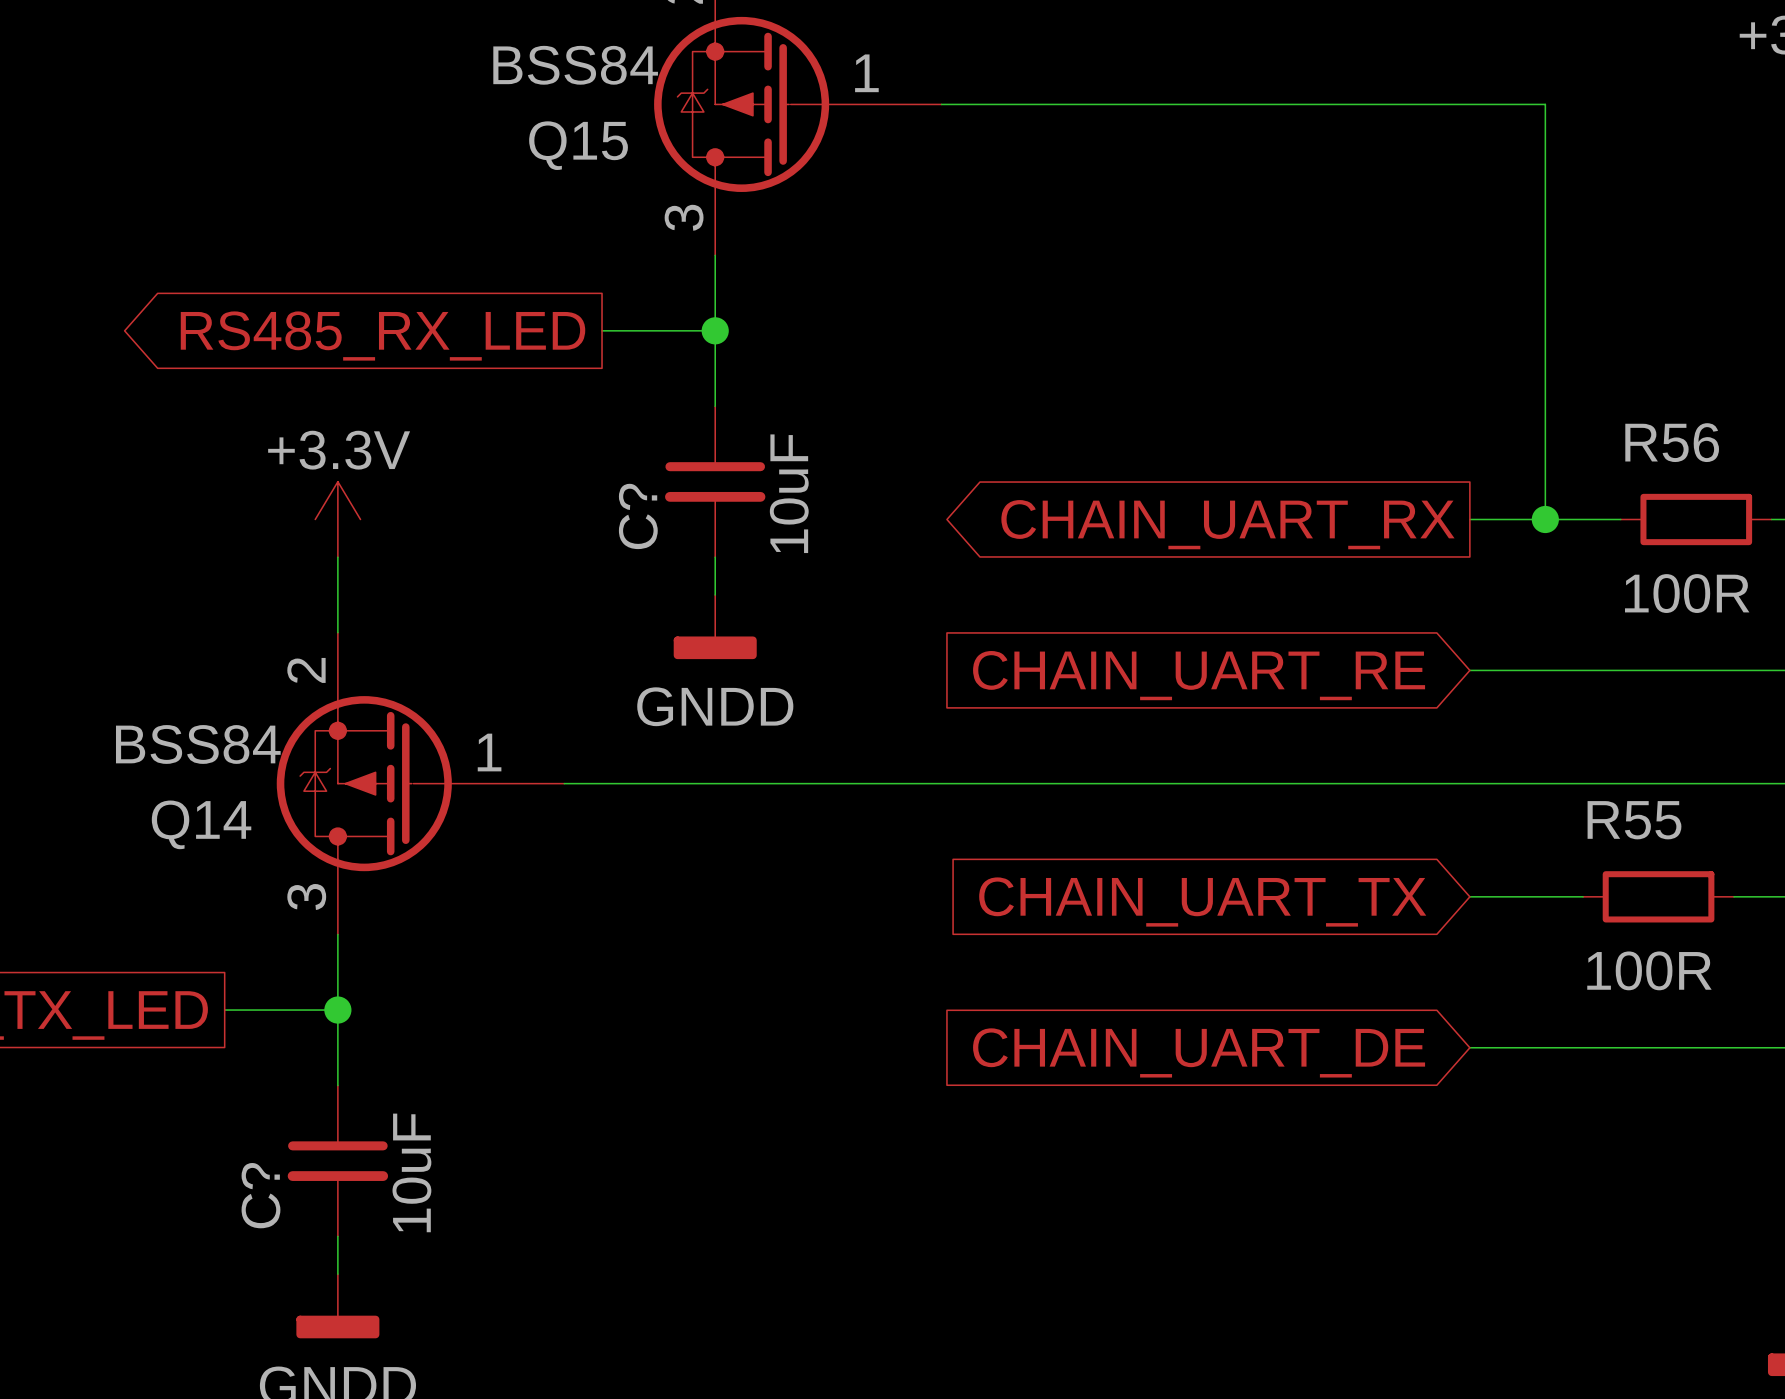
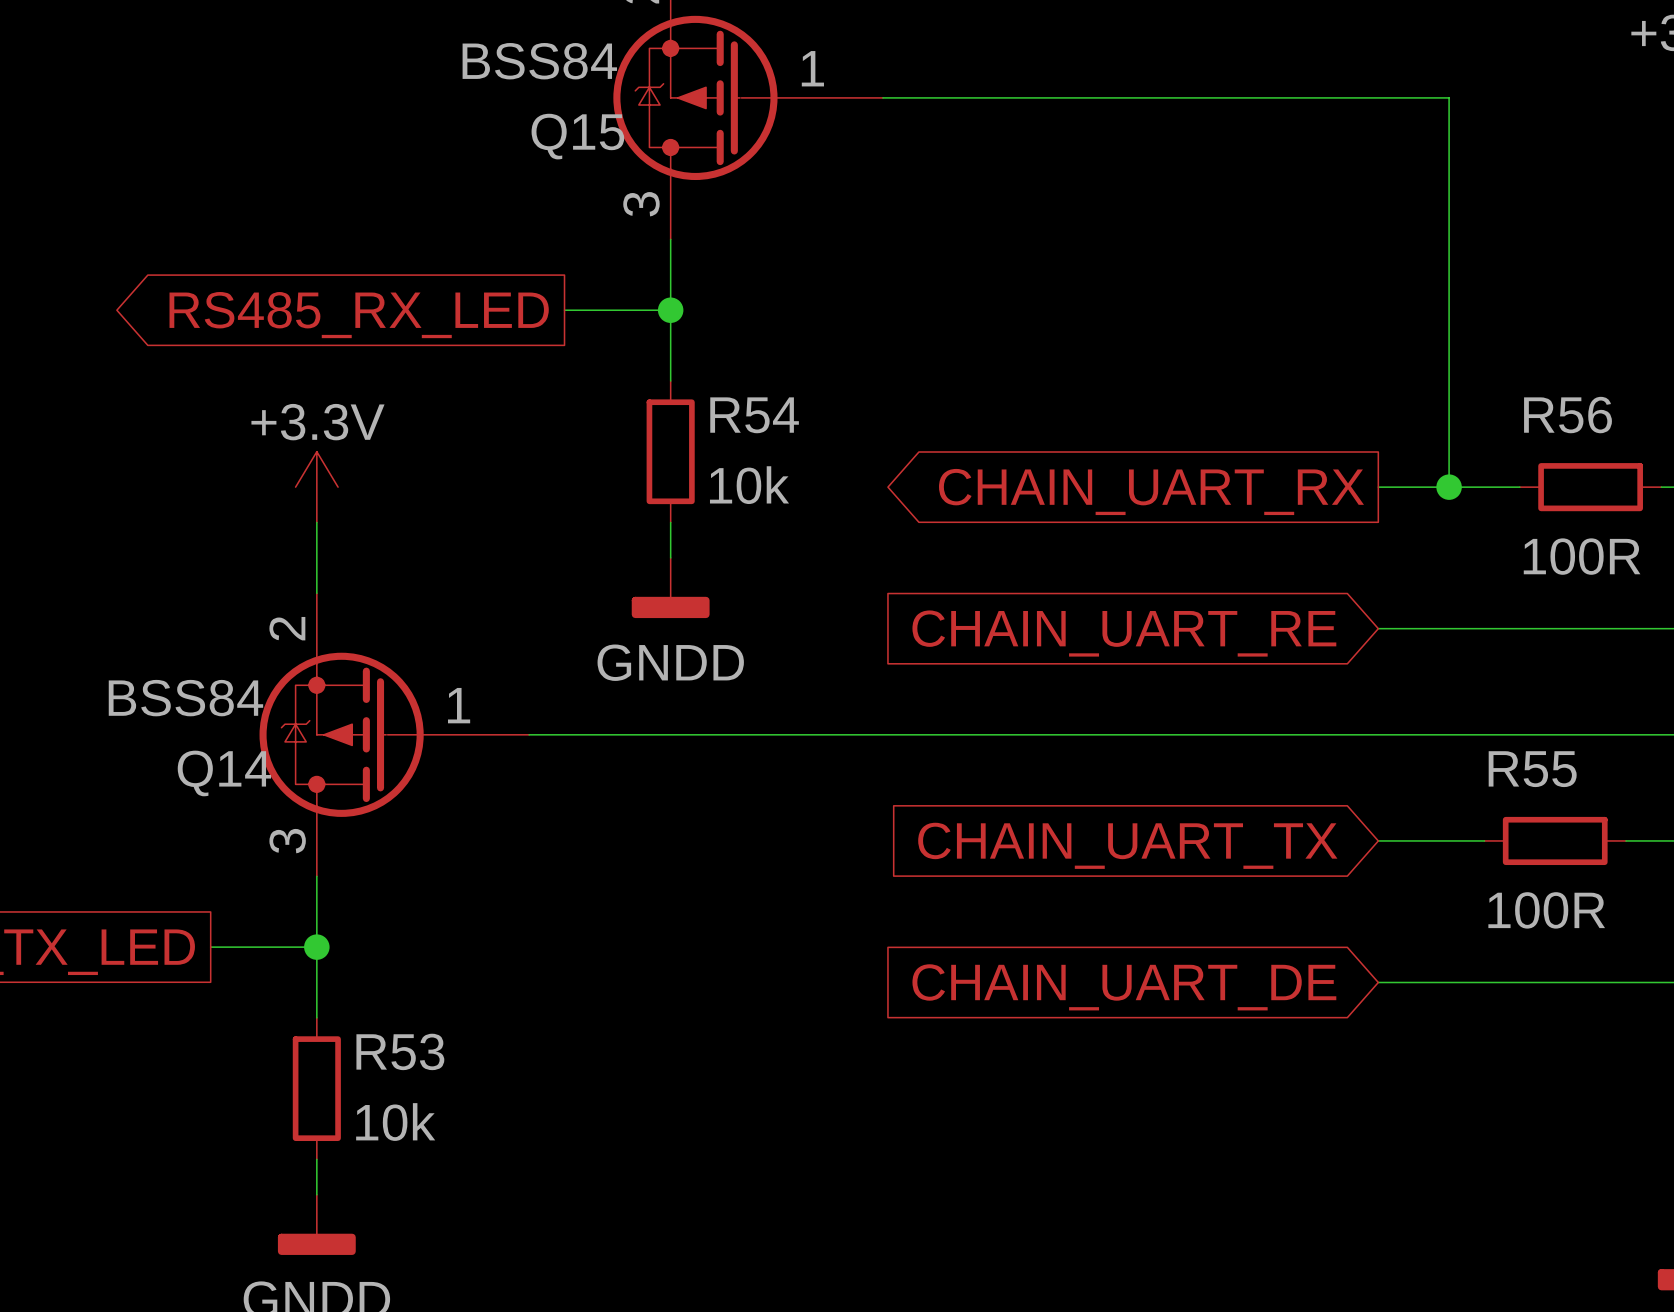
Q15 name position: Q15 (578, 145) -> Q15 (577, 136)
C?: 10uF (715, 481) -> none
R54: none -> 10k (670, 451)
Q14 name position: Q14 (201, 824) -> Q14 (224, 773)
C?: 10uF (337, 1160) -> none
R53: none -> 10k (316, 1088)

